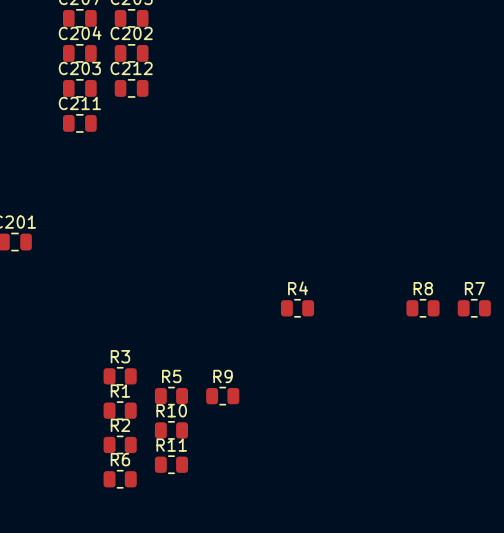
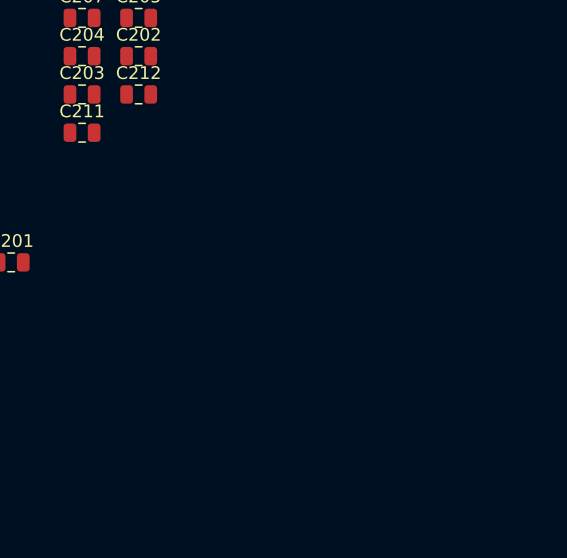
R4: (297, 308) -> none
R8: (423, 308) -> none
R7: (474, 308) -> none
R3: (120, 376) -> none
R5: (171, 396) -> none
R9: (222, 396) -> none
R1: (120, 410) -> none
R10: (171, 430) -> none
R2: (120, 444) -> none
R11: (171, 464) -> none
R6: (120, 479) -> none

